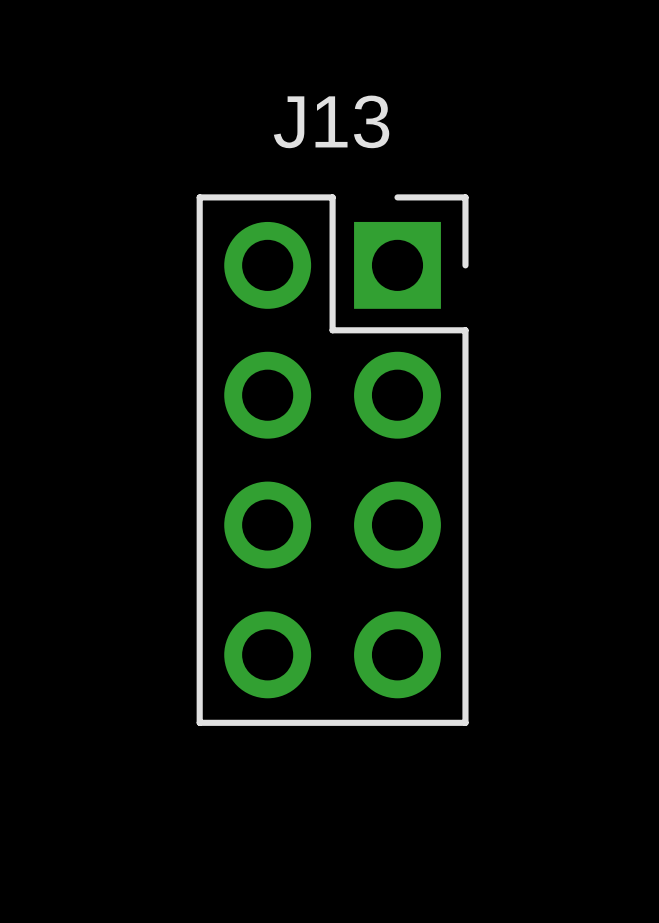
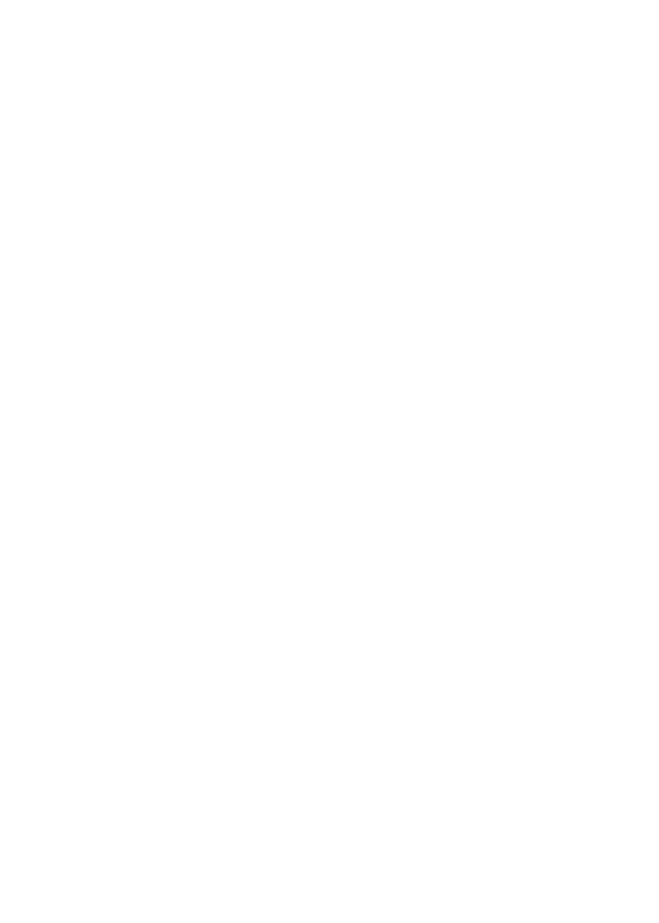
J13: (332, 460) -> none

